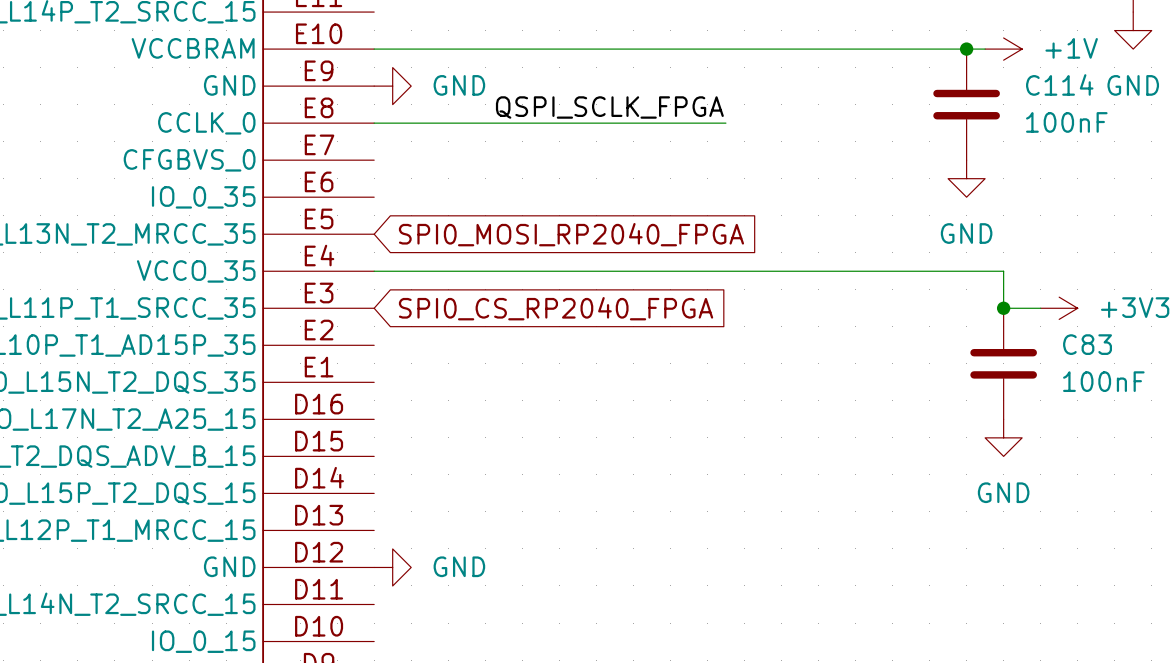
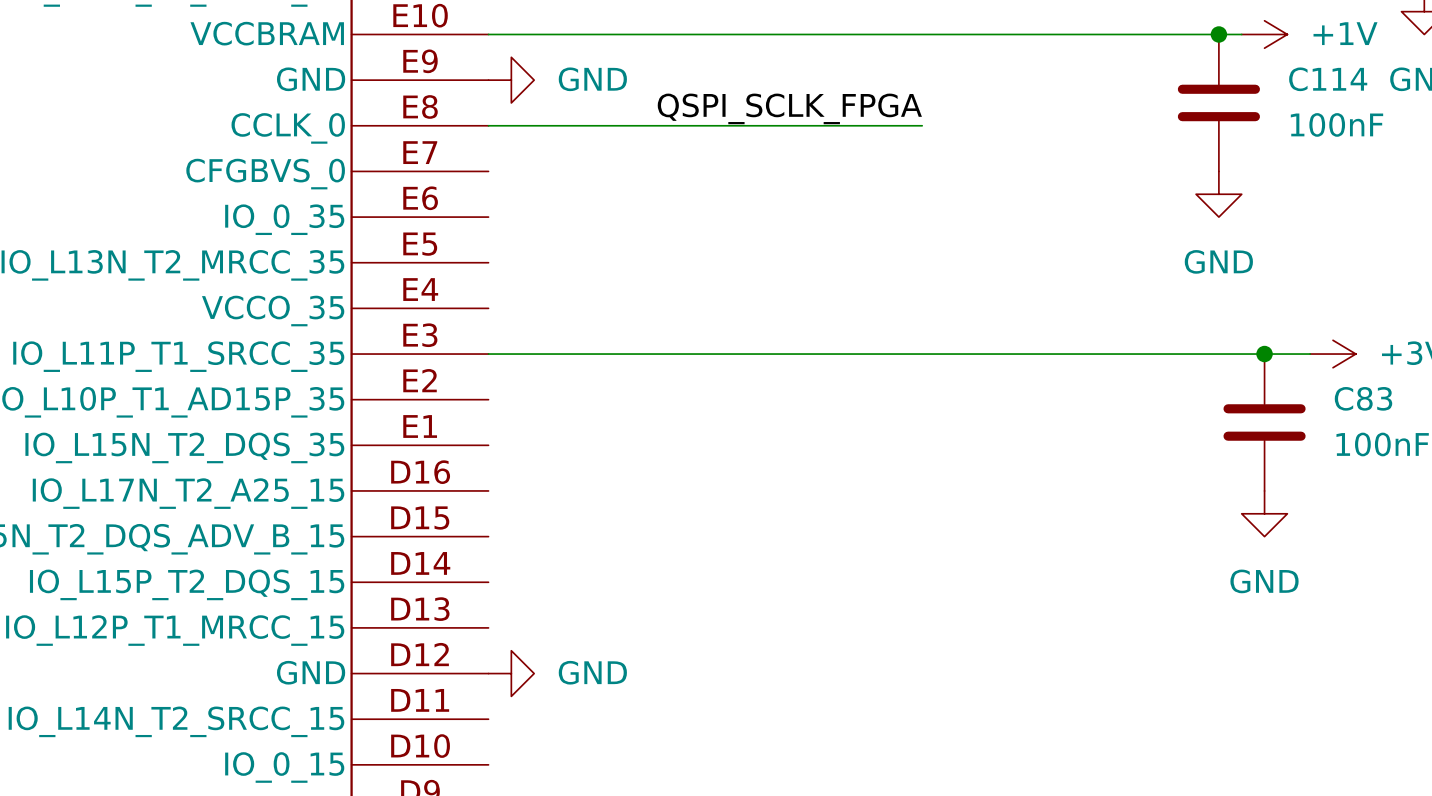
global label: SPI0_MOSI_RP2040_FPGA (571, 234) -> none
wire: (374, 271) (1003, 271) (1003, 308) -> (488, 354) (1264, 354)
global label: SPI0_CS_RP2040_FPGA (556, 308) -> none

